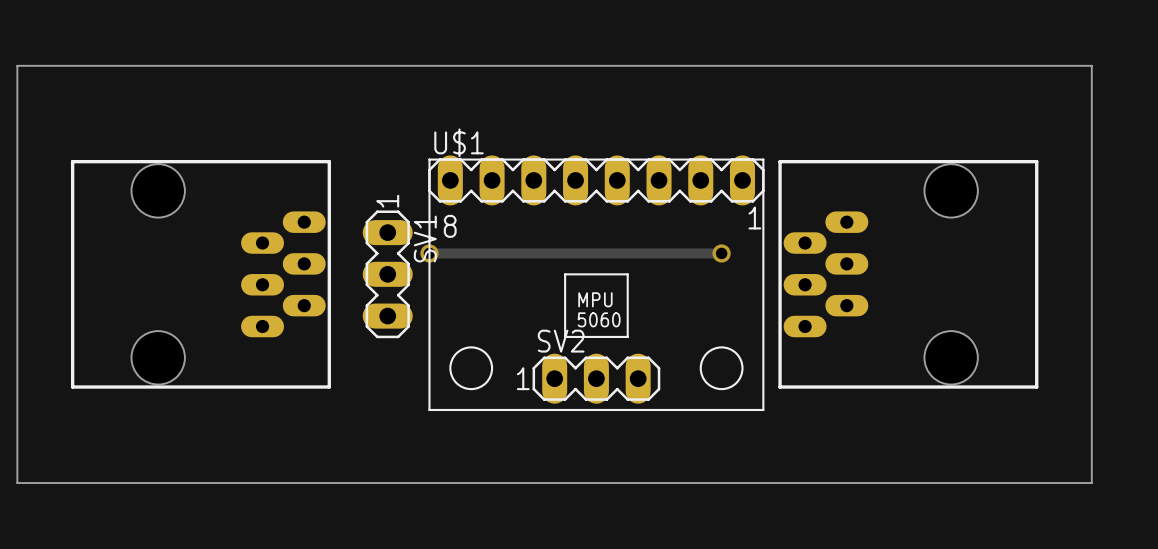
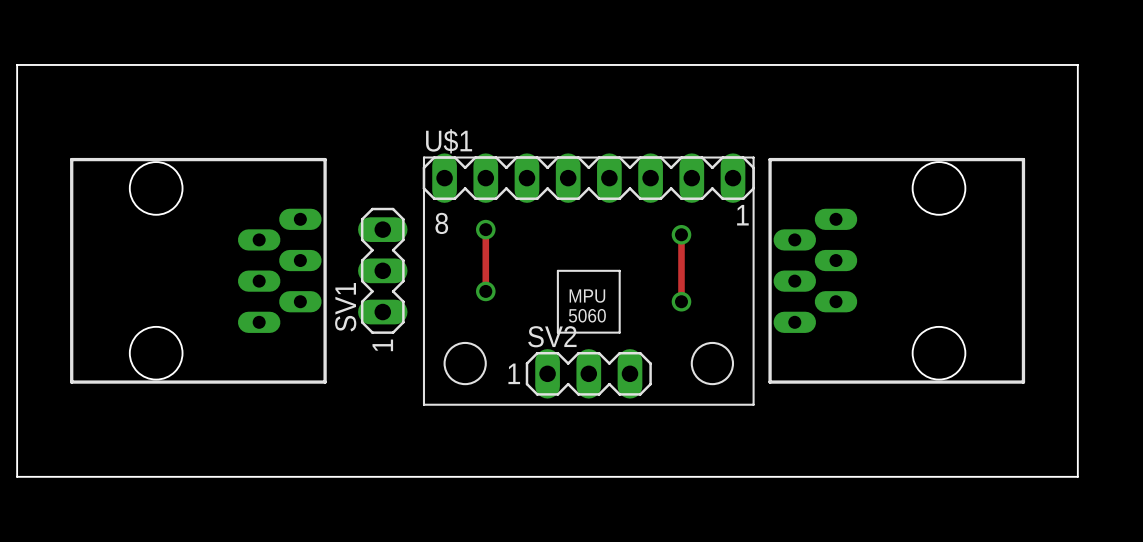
SV1 text position: 1 (387, 201) -> 1 (382, 345)
track: none -> (485, 229) (485, 291)
via: none -> (485, 229)
track: none -> (681, 234) (681, 301)
via: none -> (681, 234)
SV1 name position: SV1 (425, 239) -> SV1 (345, 307)
track: (429, 253) (721, 253) -> none
via: (429, 253) -> none
via: (721, 253) -> none
via: none -> (485, 291)
via: none -> (681, 301)

